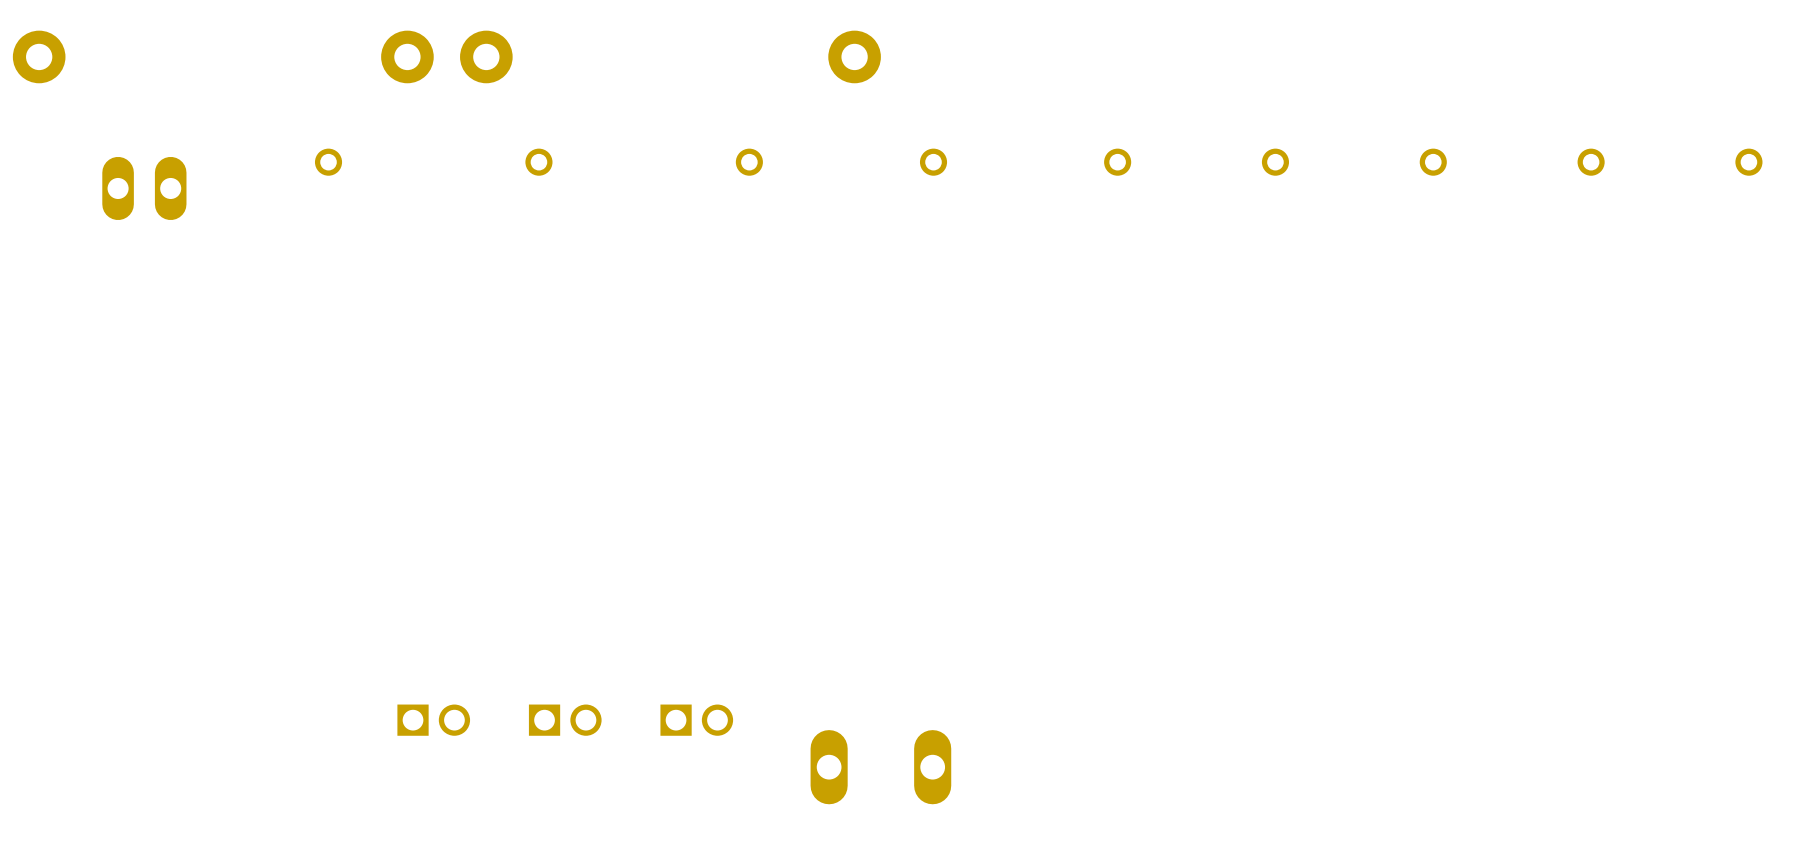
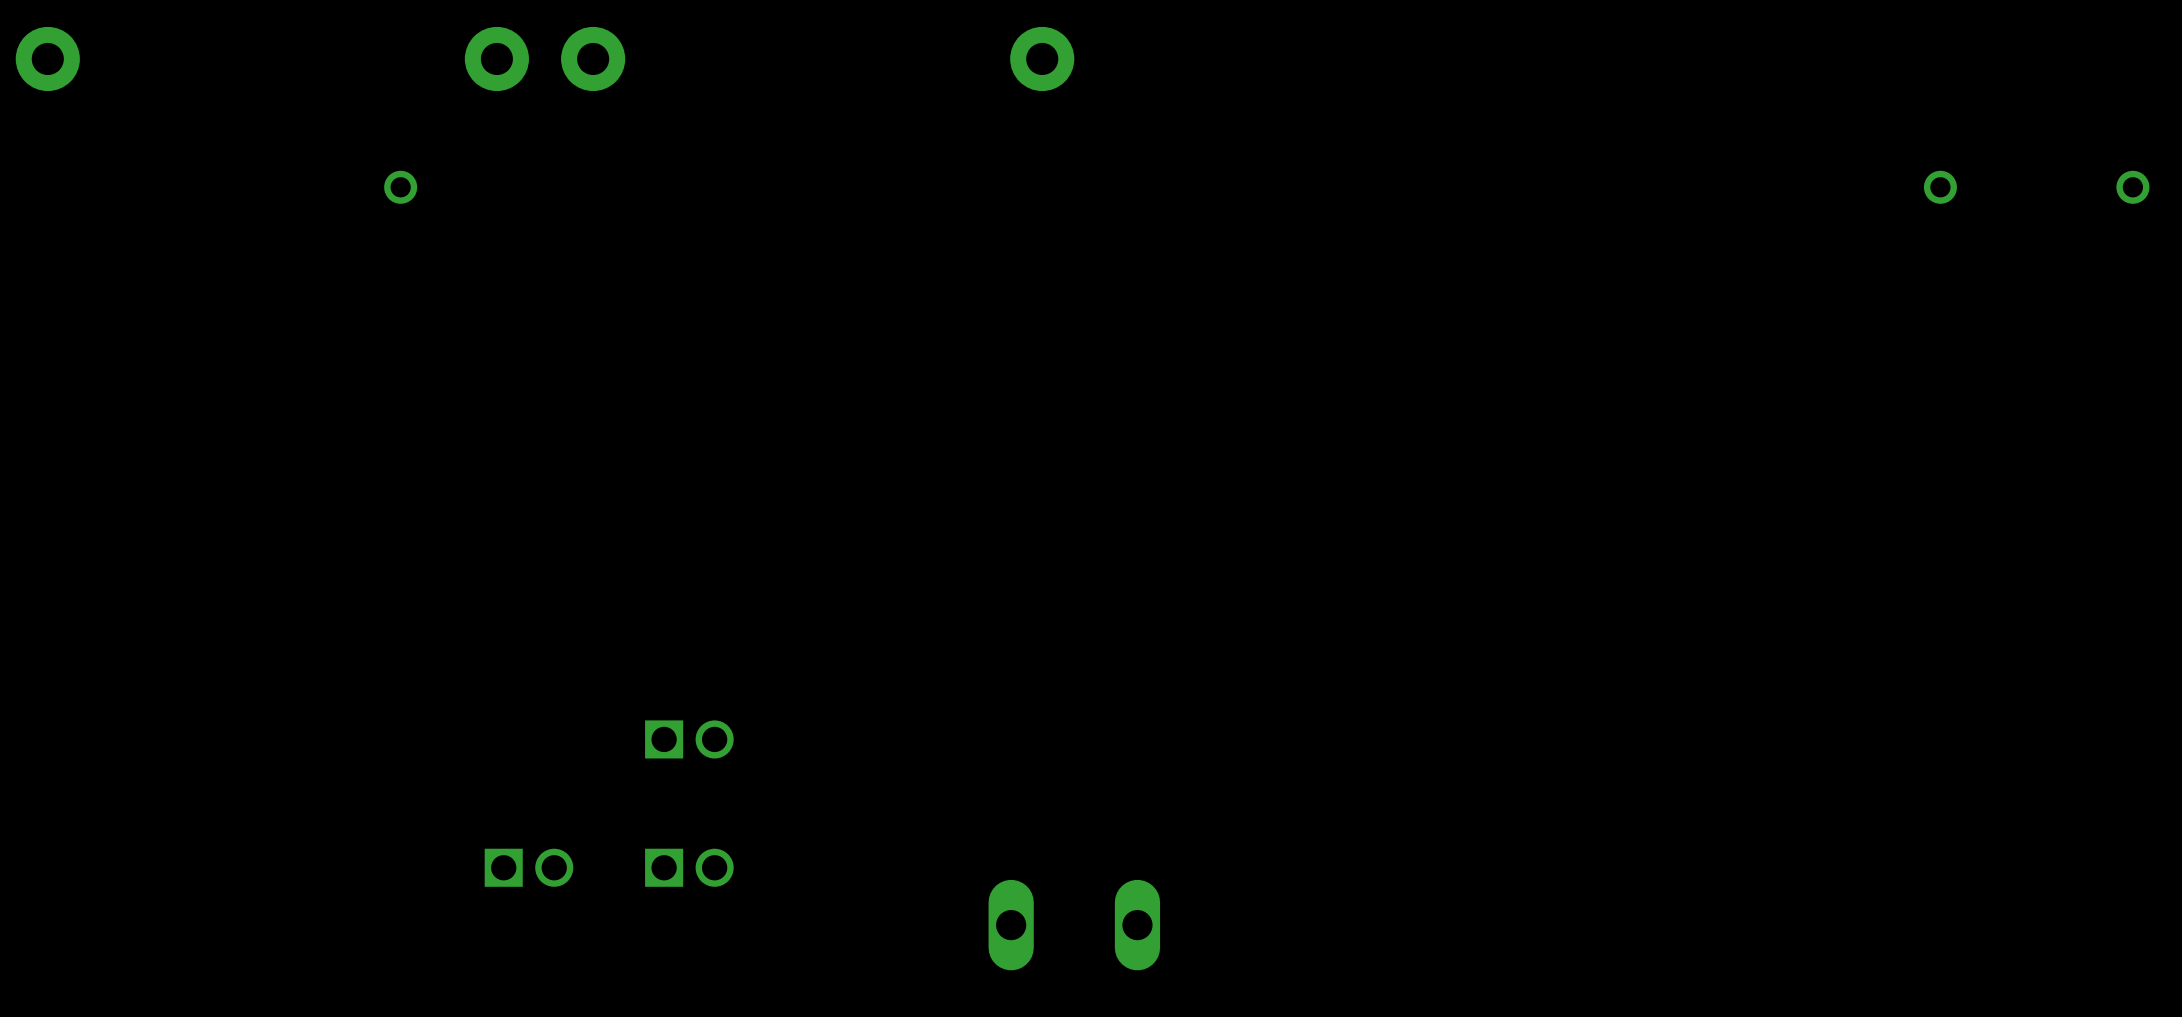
part: (538, 162) -> none
part: (749, 162) -> none
part: (933, 162) -> none
part: (1117, 162) -> none
part: (1275, 162) -> none
part: (1433, 162) -> none
part: (144, 188) -> none
part position: (696, 720) -> (689, 739)

